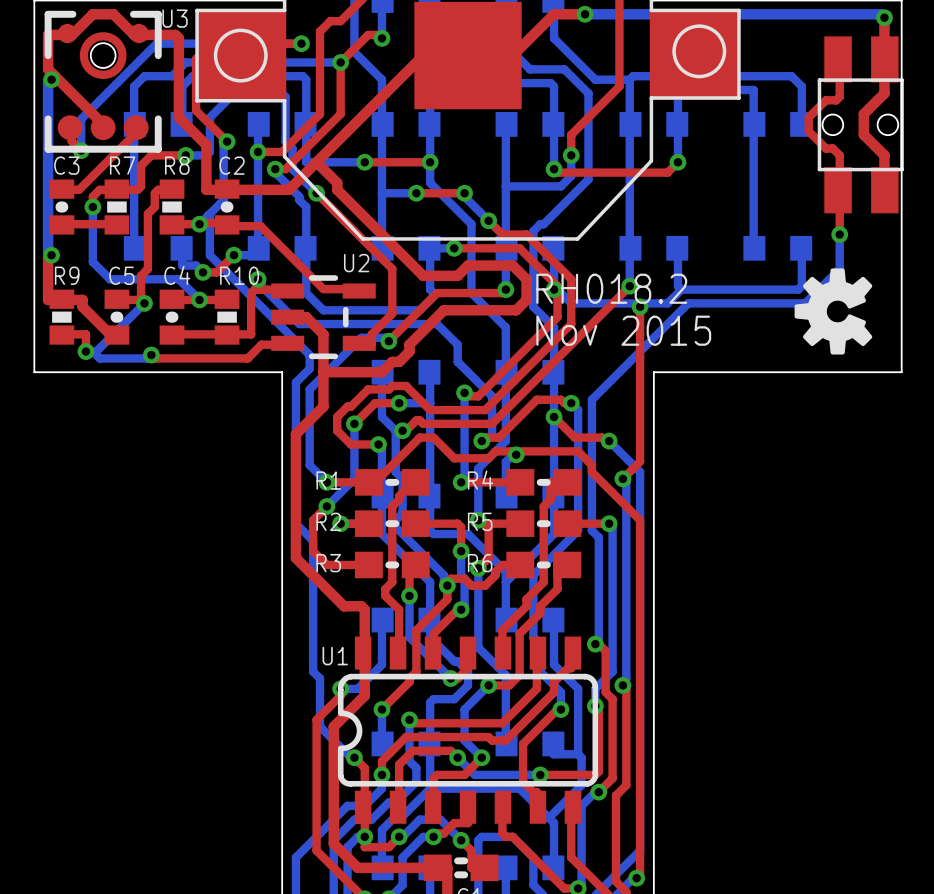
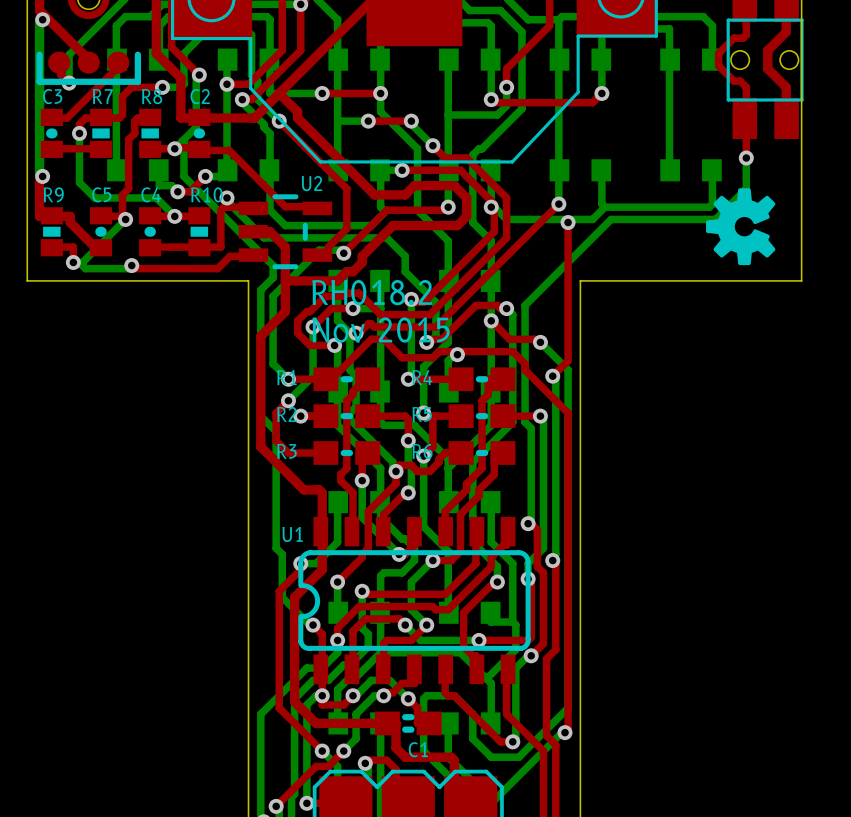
text position: RH018.2 (611, 288) -> RH018.2 (372, 292)
text position: Nov 2015 (623, 330) -> Nov 2015 (381, 330)

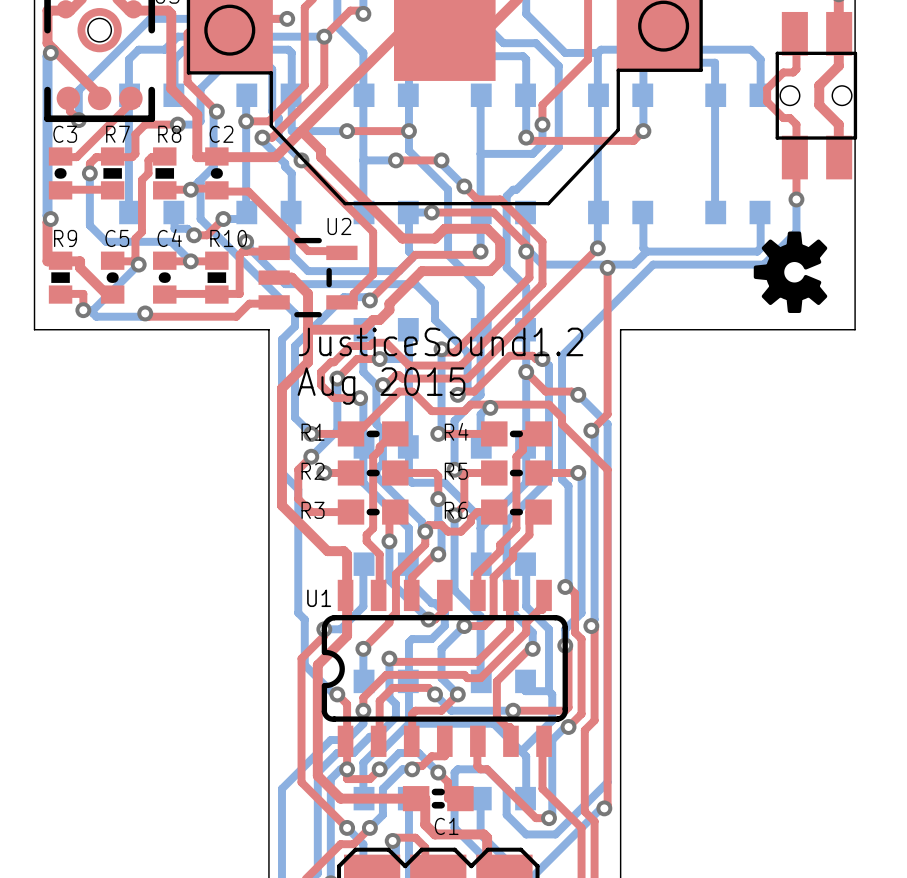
text: none -> JusticeSound1.2 (441, 341)
text: RH018.2 (372, 292) -> none
text: Nov 2015 (381, 330) -> Aug 2015 (381, 386)

